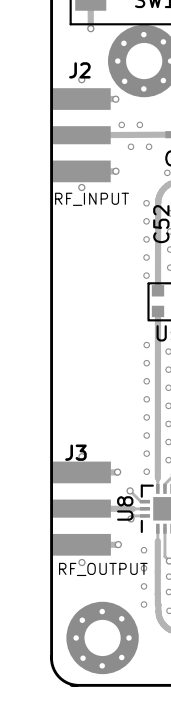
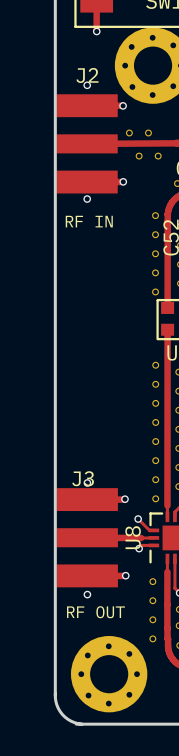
J2 value: RF_INPUT (92, 199) -> RF IN (89, 221)
J3 value: RF_OUTPUT (103, 569) -> RF OUT (95, 612)

